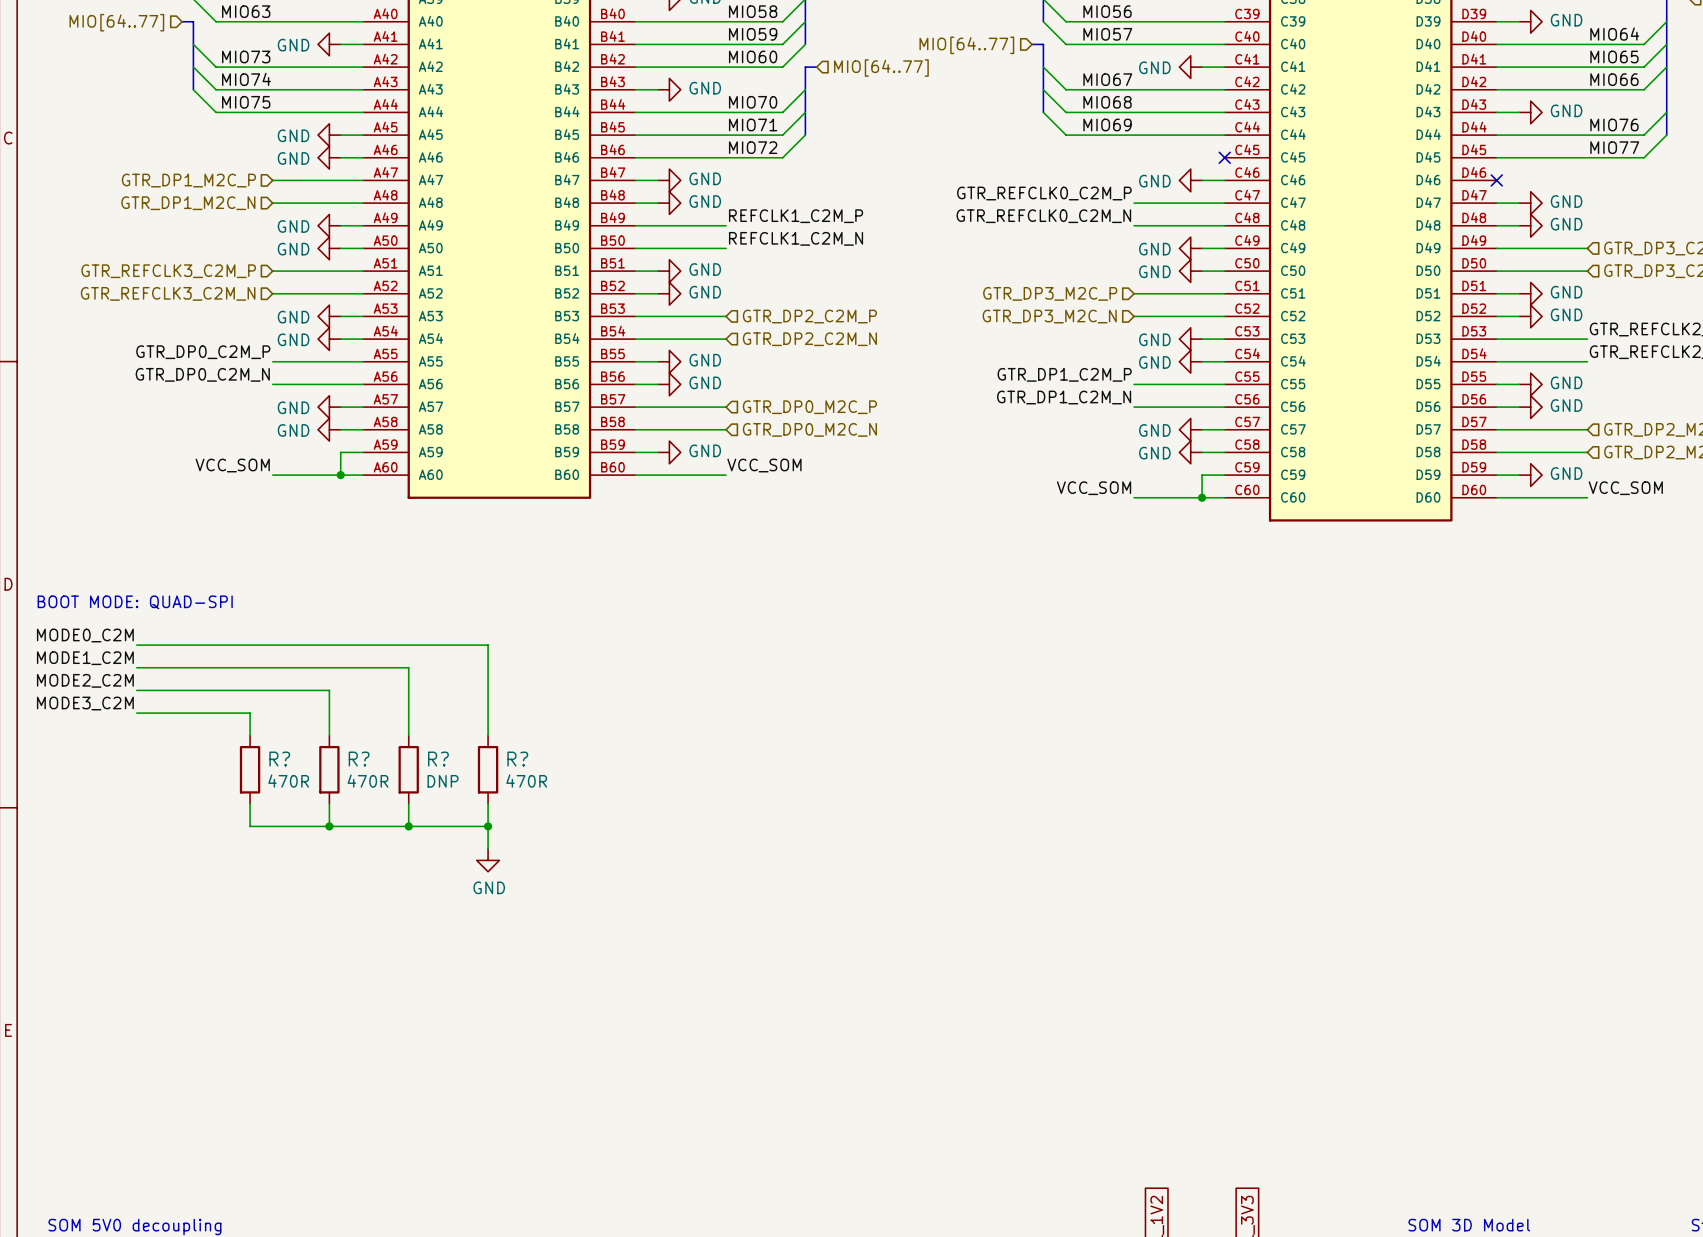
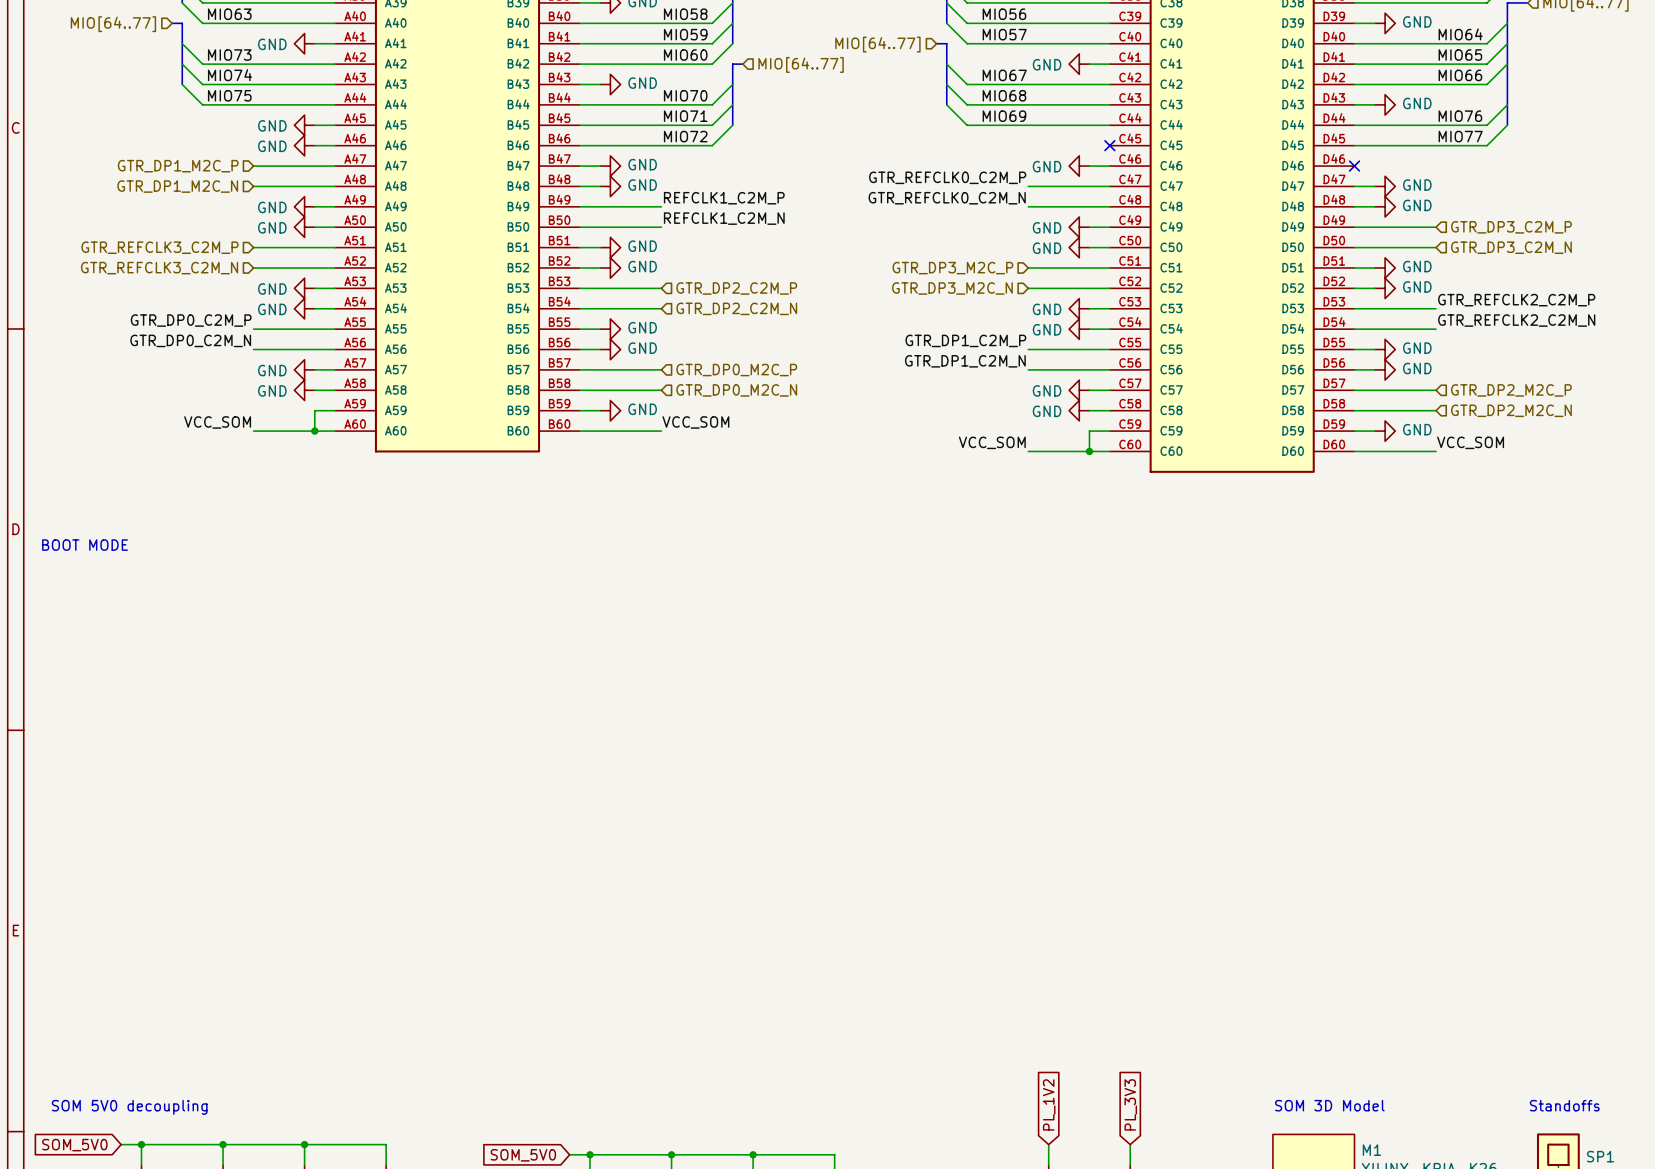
text: BOOT MODE: QUAD-SPI (135, 602) -> BOOT MODE (85, 545)
label: MODE0_C2M (85, 635) -> none
wire: (136, 645) (488, 645) (488, 735) -> none
label: MODE1_C2M (85, 658) -> none
wire: (136, 667) (408, 667) (408, 735) -> none
label: MODE2_C2M (85, 680) -> none
wire: (136, 690) (329, 690) (329, 735) -> none
label: MODE3_C2M (85, 703) -> none
wire: (136, 713) (250, 713) (250, 735) -> none
R?: (250, 769) -> none
R?: (329, 769) -> none
R?: (408, 769) -> none
R?: (488, 769) -> none
wire: (250, 803) (250, 826) (488, 826) -> none
wire: (329, 803) (329, 826) -> none
wire: (408, 803) (408, 826) -> none
wire: (488, 803) (488, 849) -> none
junction: (329, 826) -> none
junction: (408, 826) -> none
junction: (488, 826) -> none
power symbol: GND (488, 860) -> none

